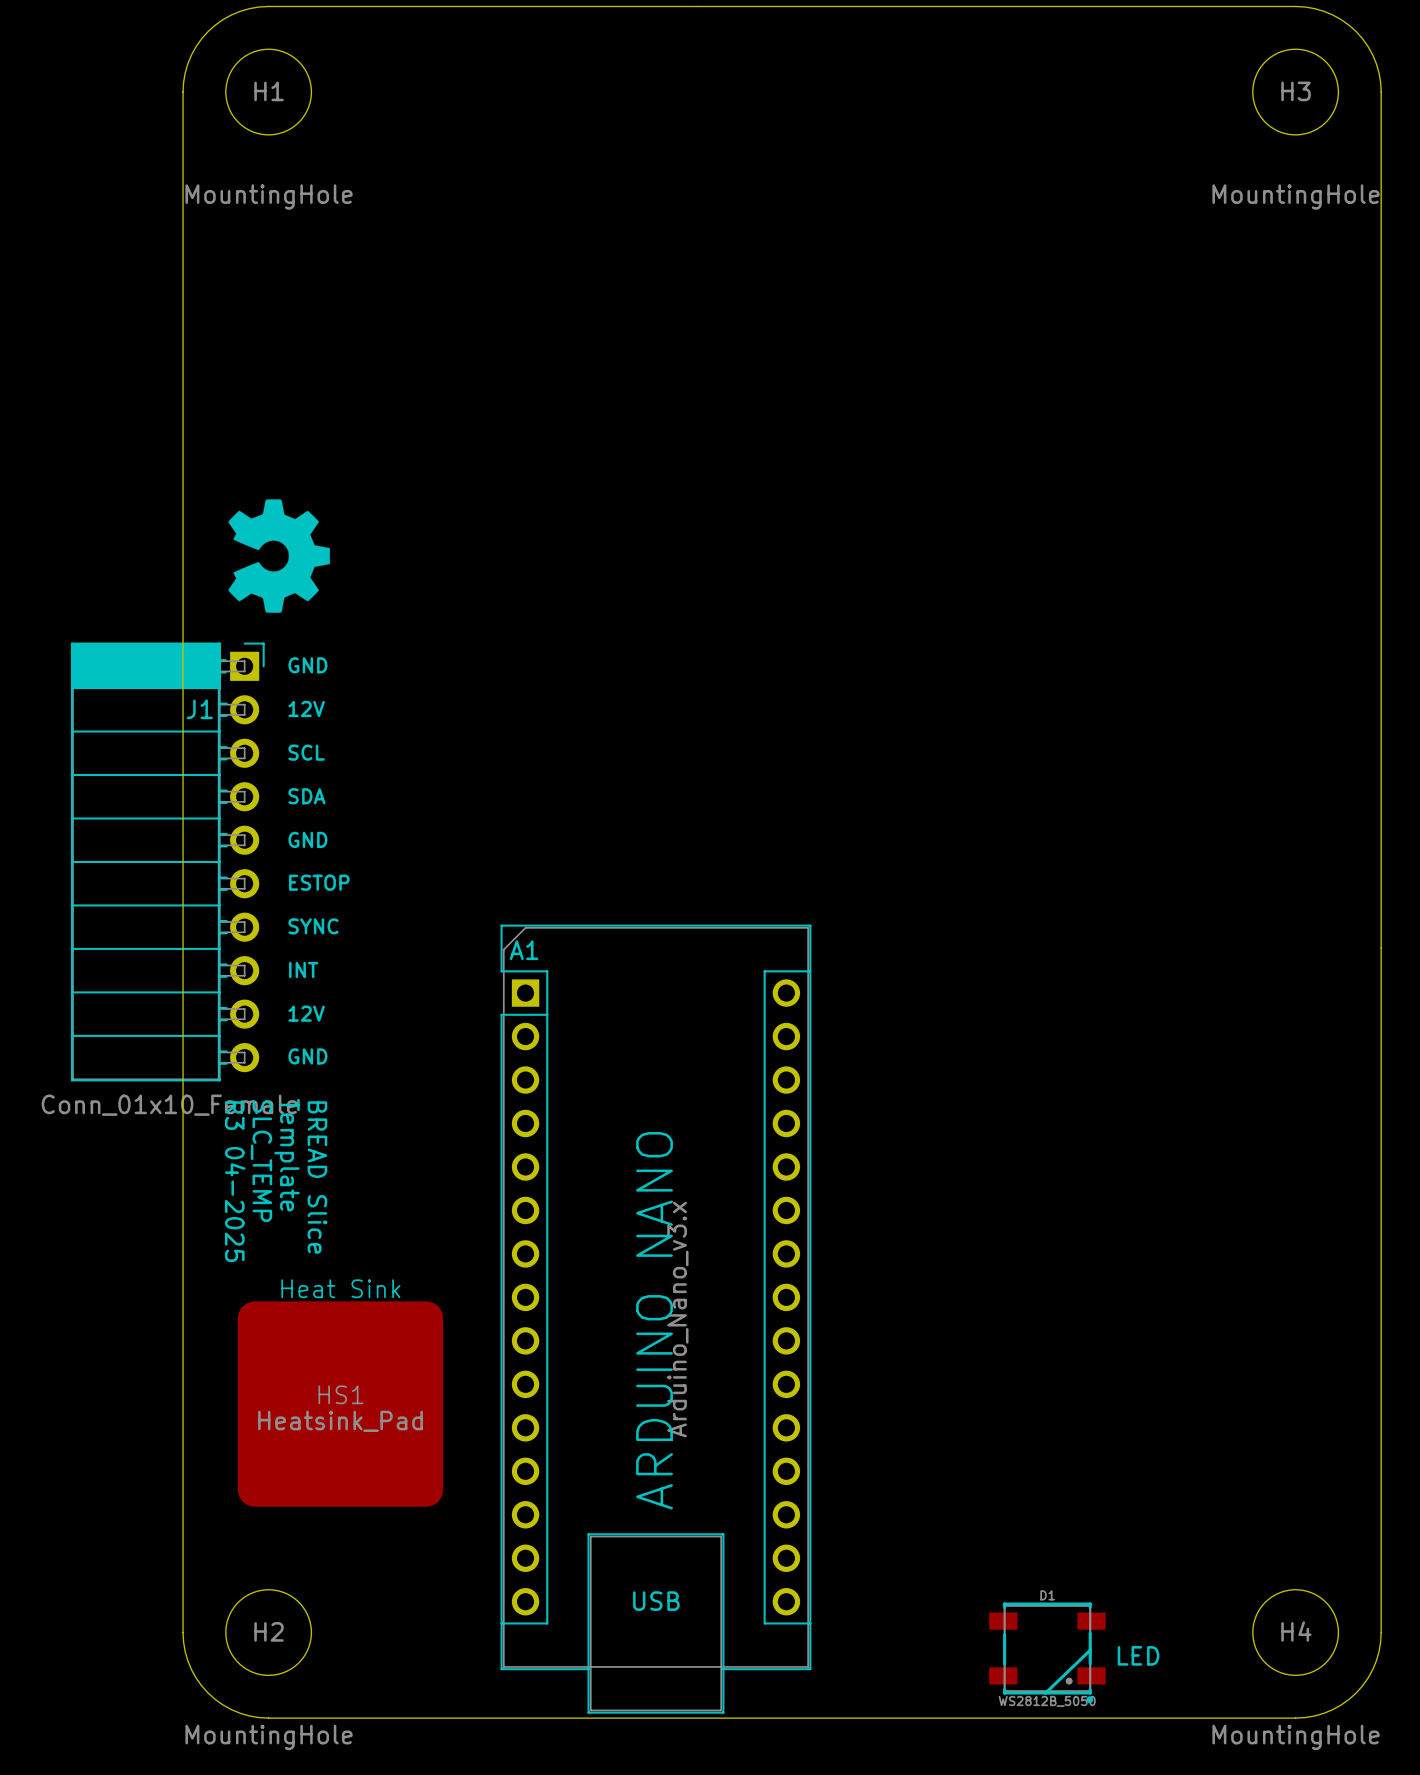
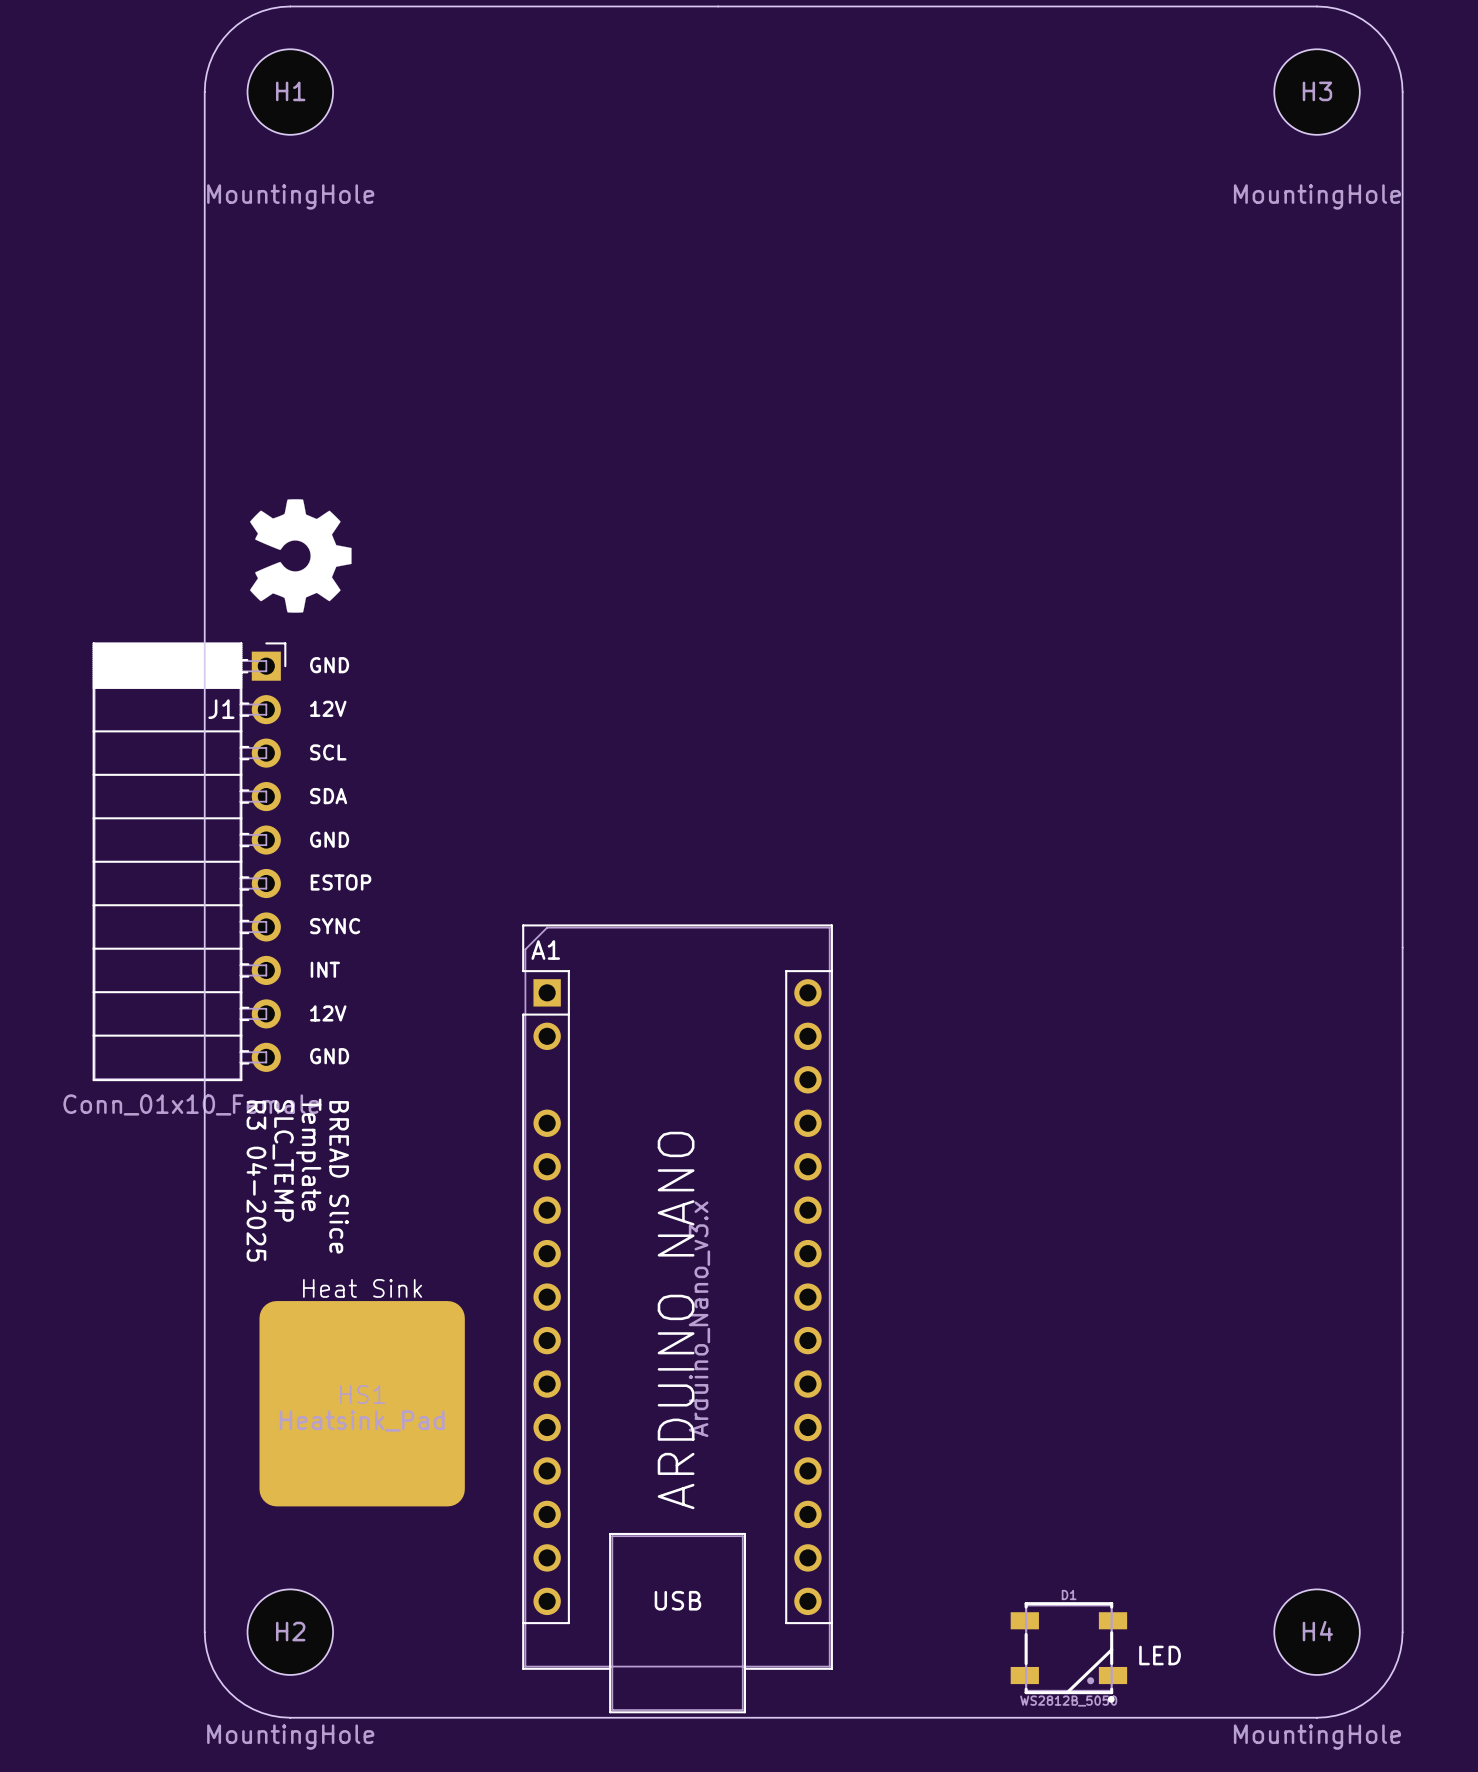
A1 footprint: [500, 924, 812, 1714] -> [522, 924, 833, 1714]

